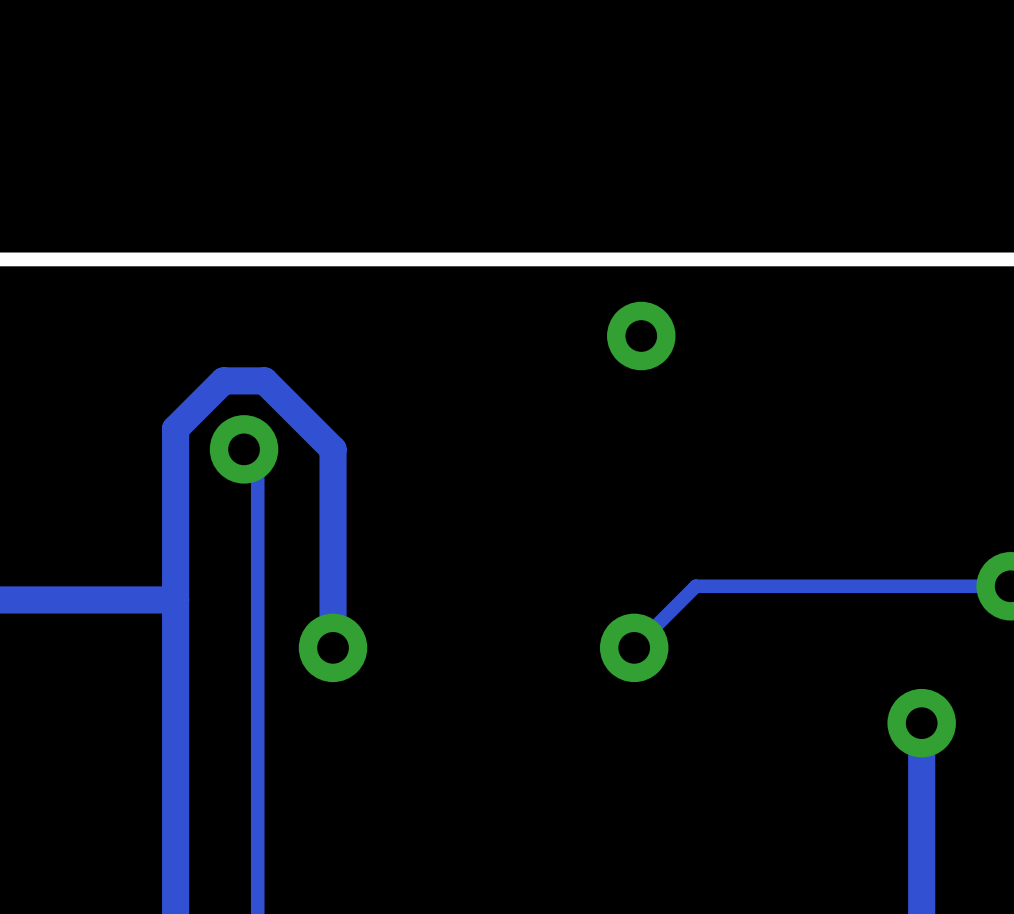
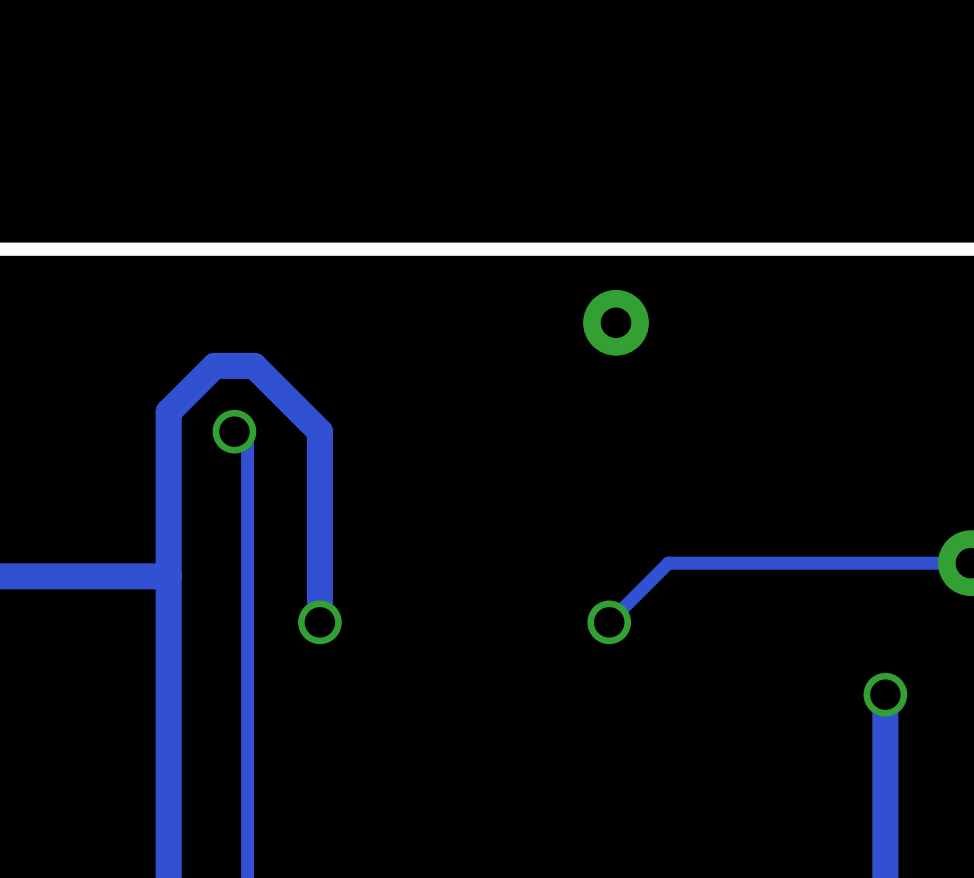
via size: [209, 415, 279, 484] -> [212, 409, 257, 454]
via size: [298, 613, 368, 683] -> [298, 600, 342, 645]
via size: [599, 613, 669, 683] -> [587, 600, 632, 645]
via size: [887, 688, 956, 758] -> [863, 672, 908, 717]

